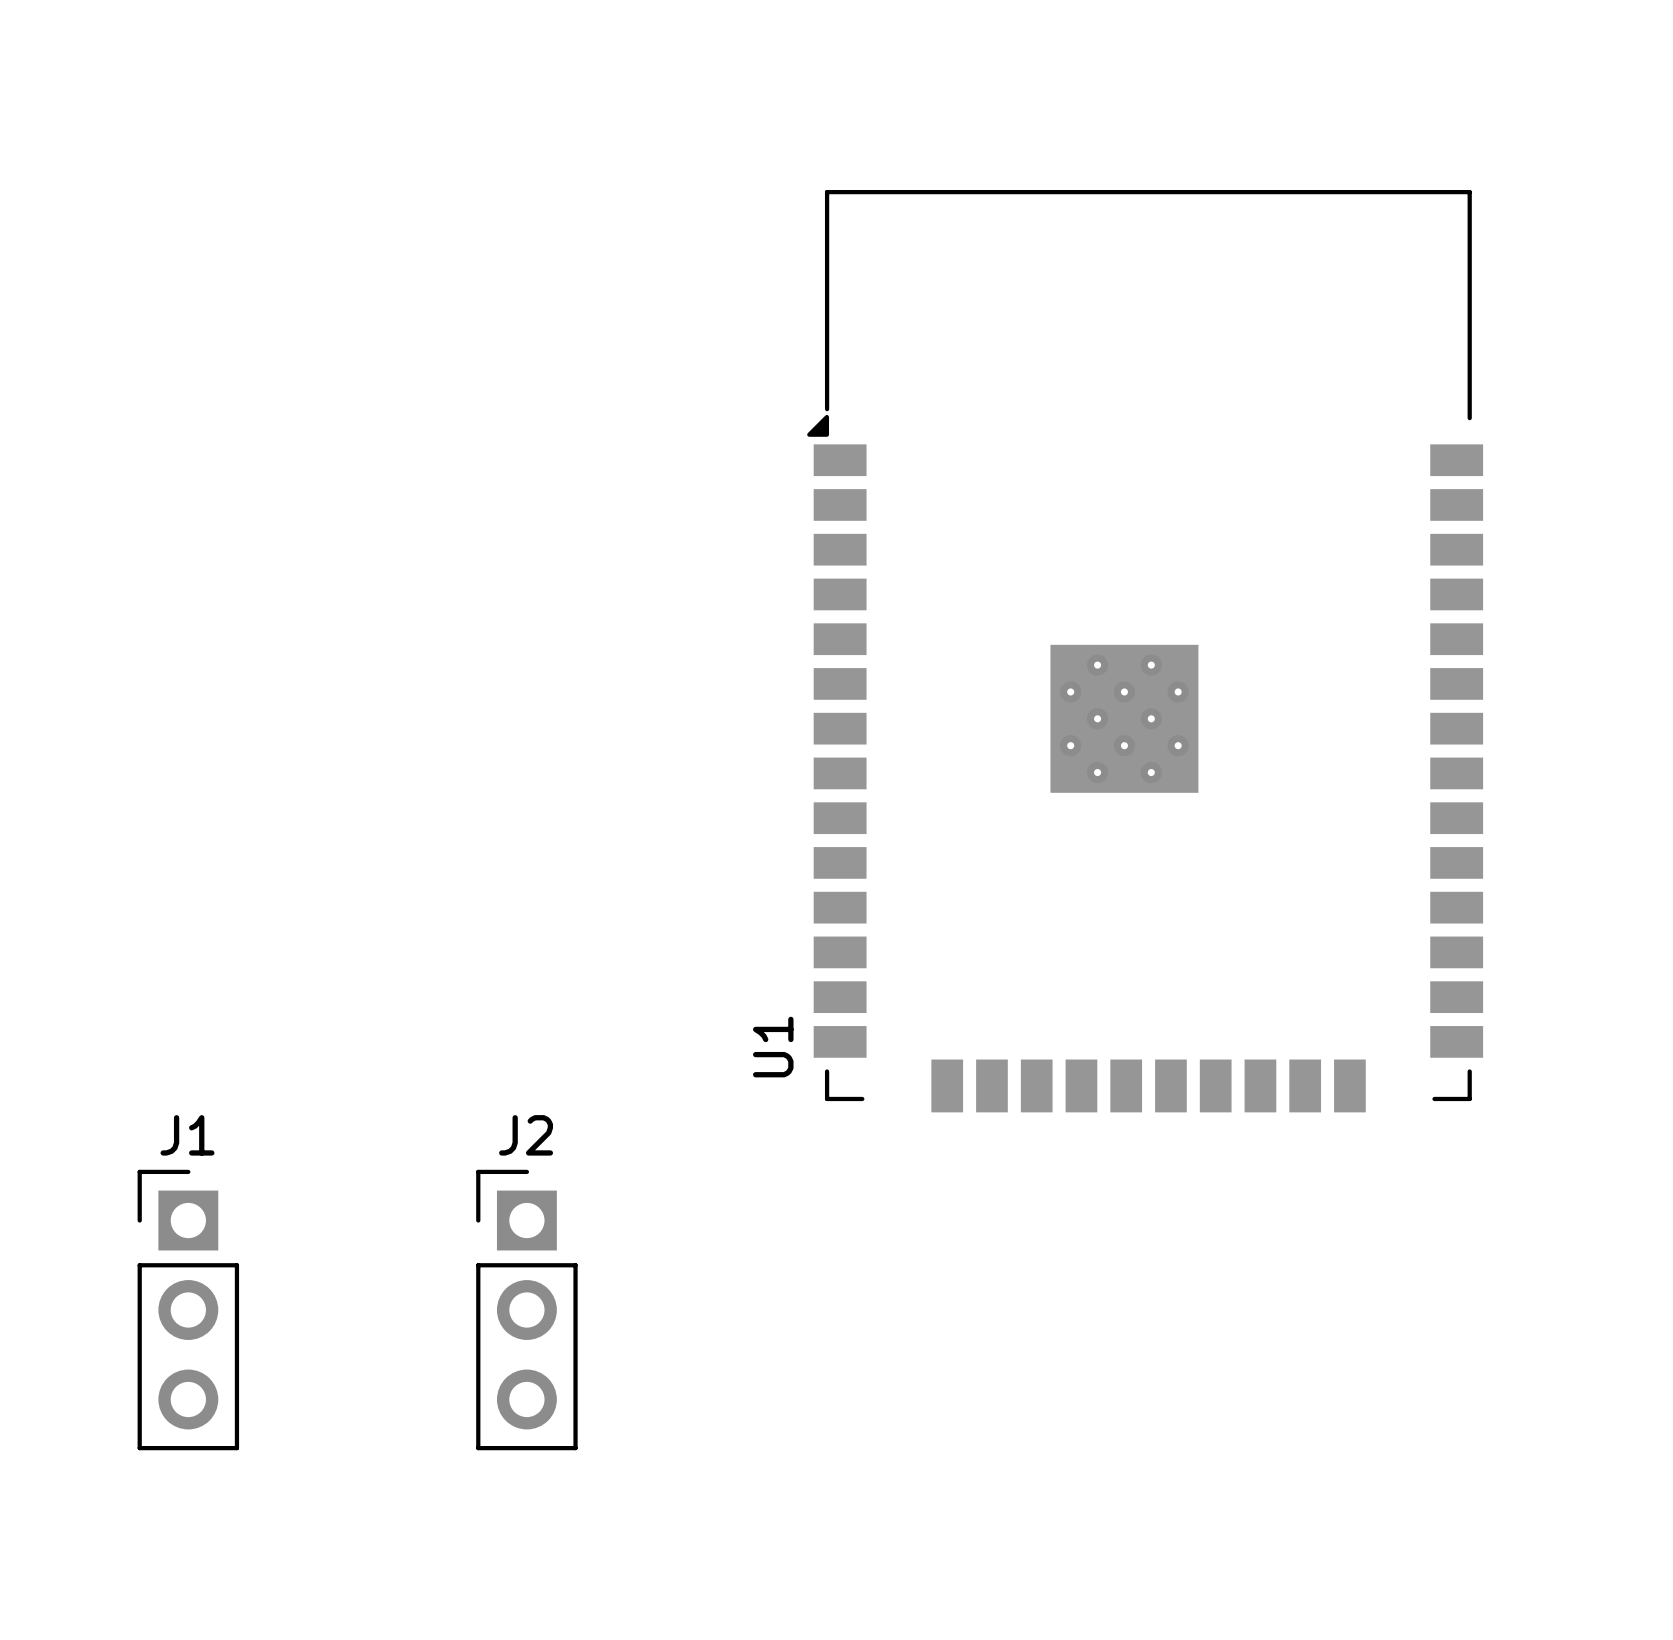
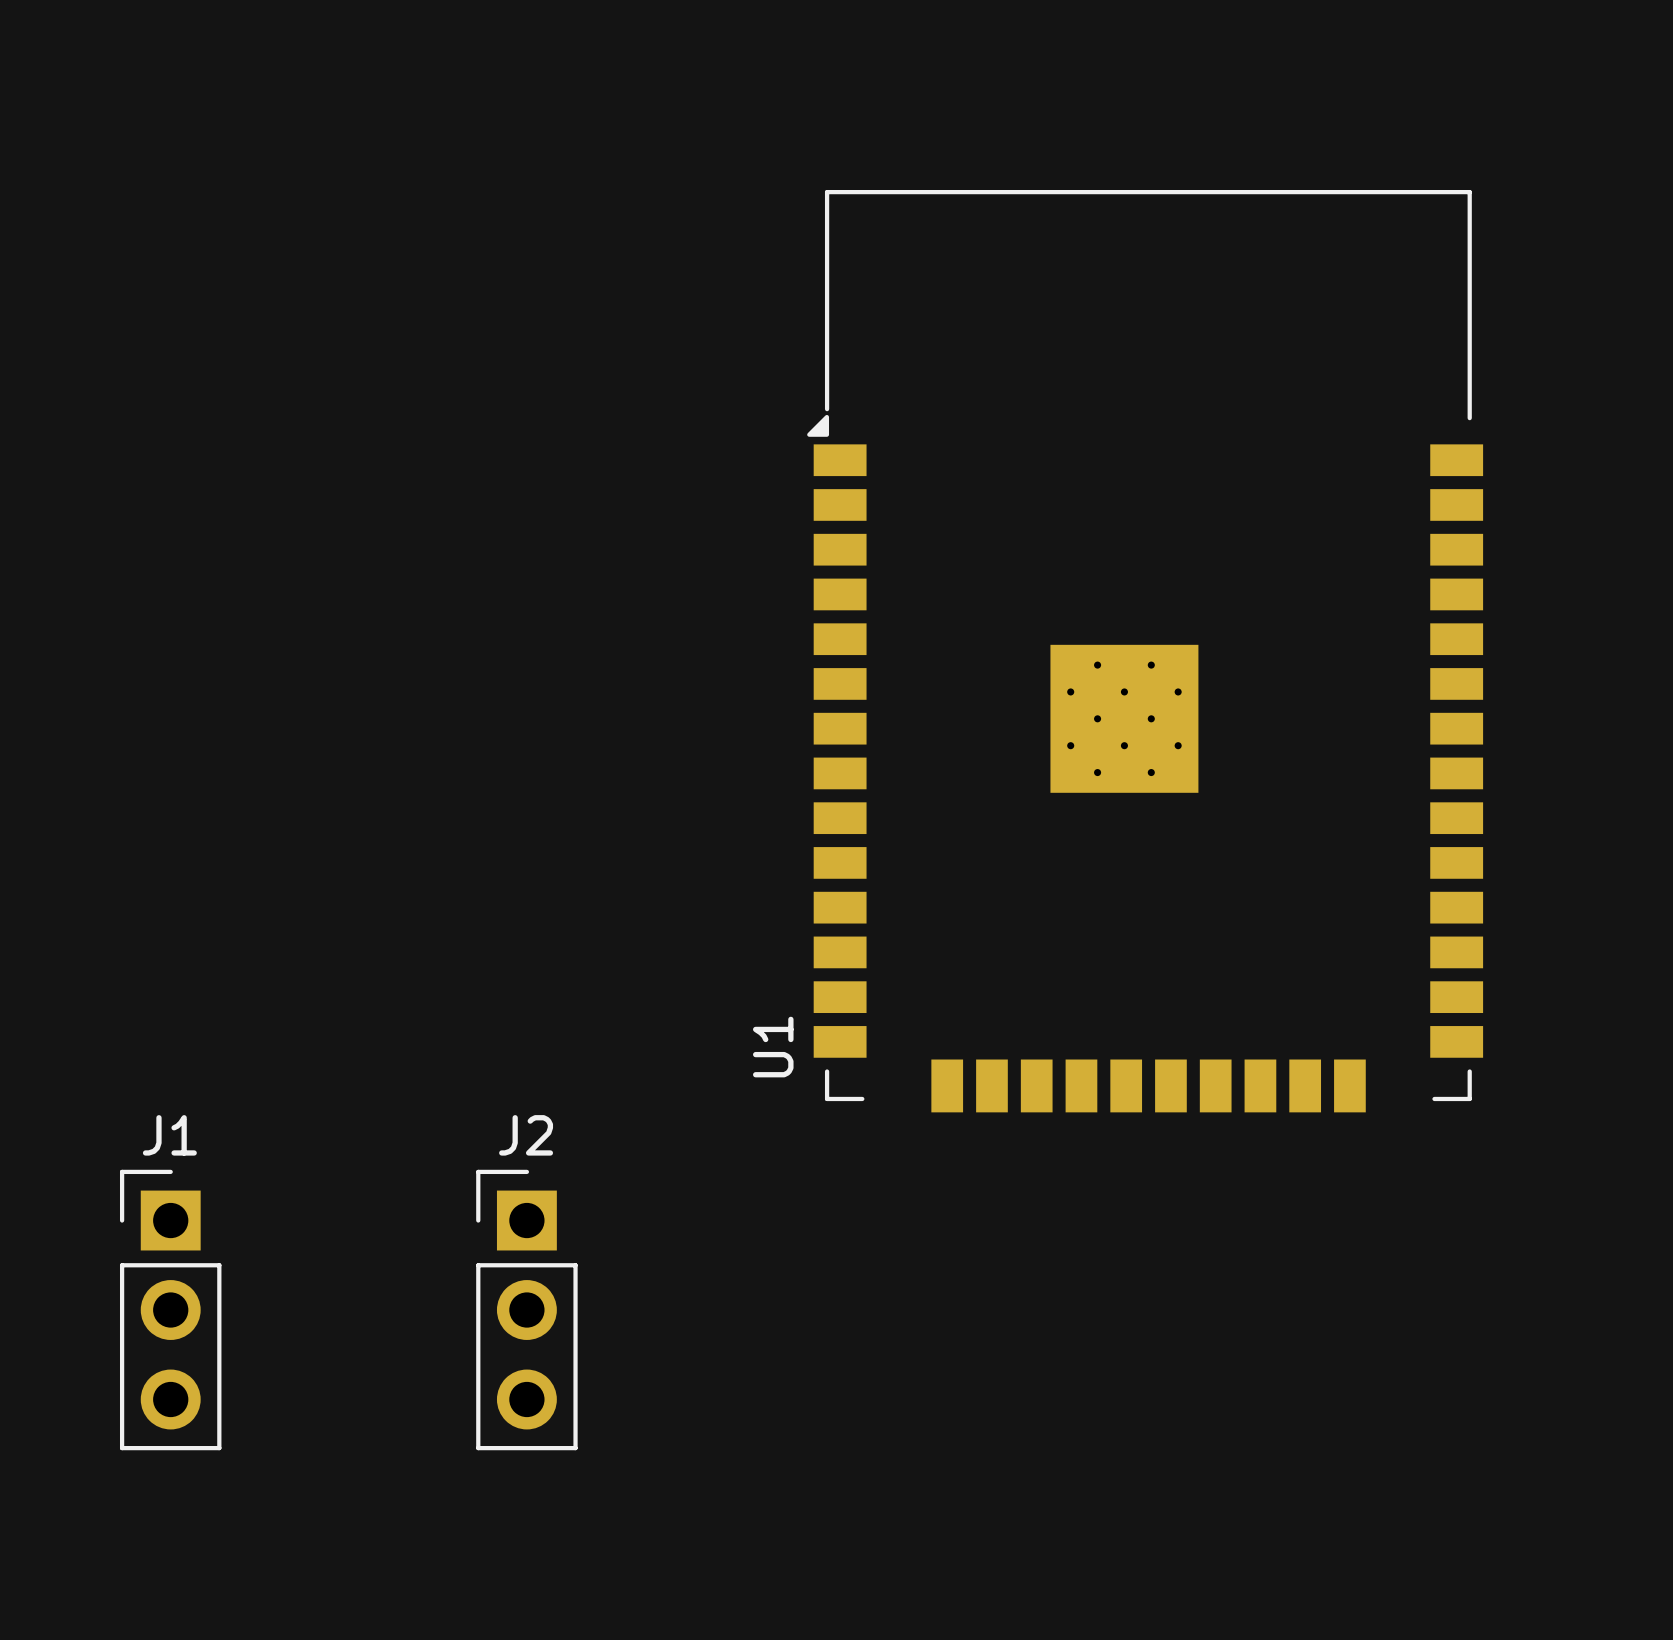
J1 position: (188, 1310) -> (170, 1310)

